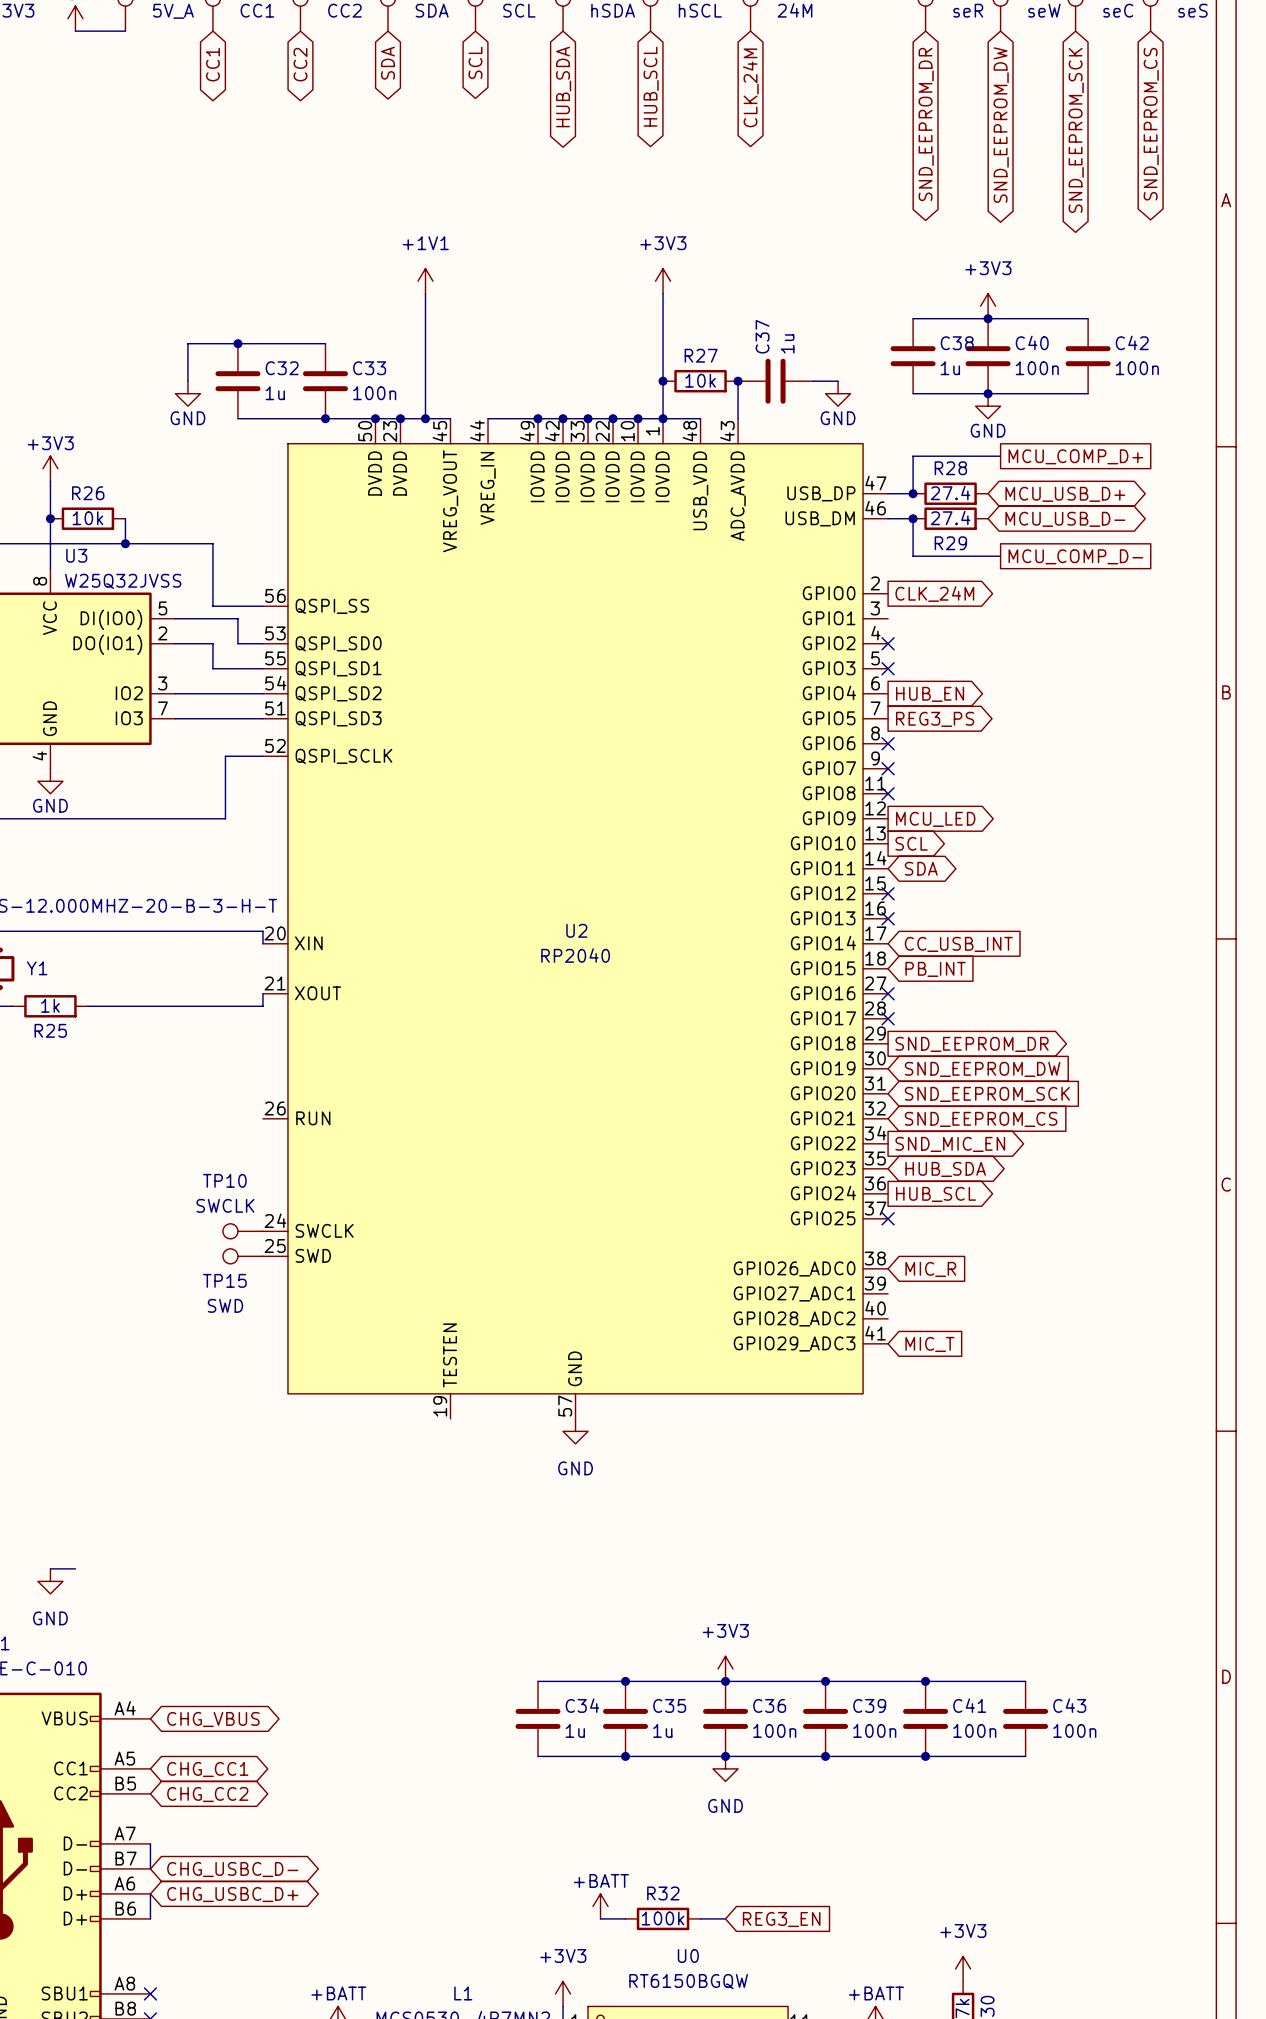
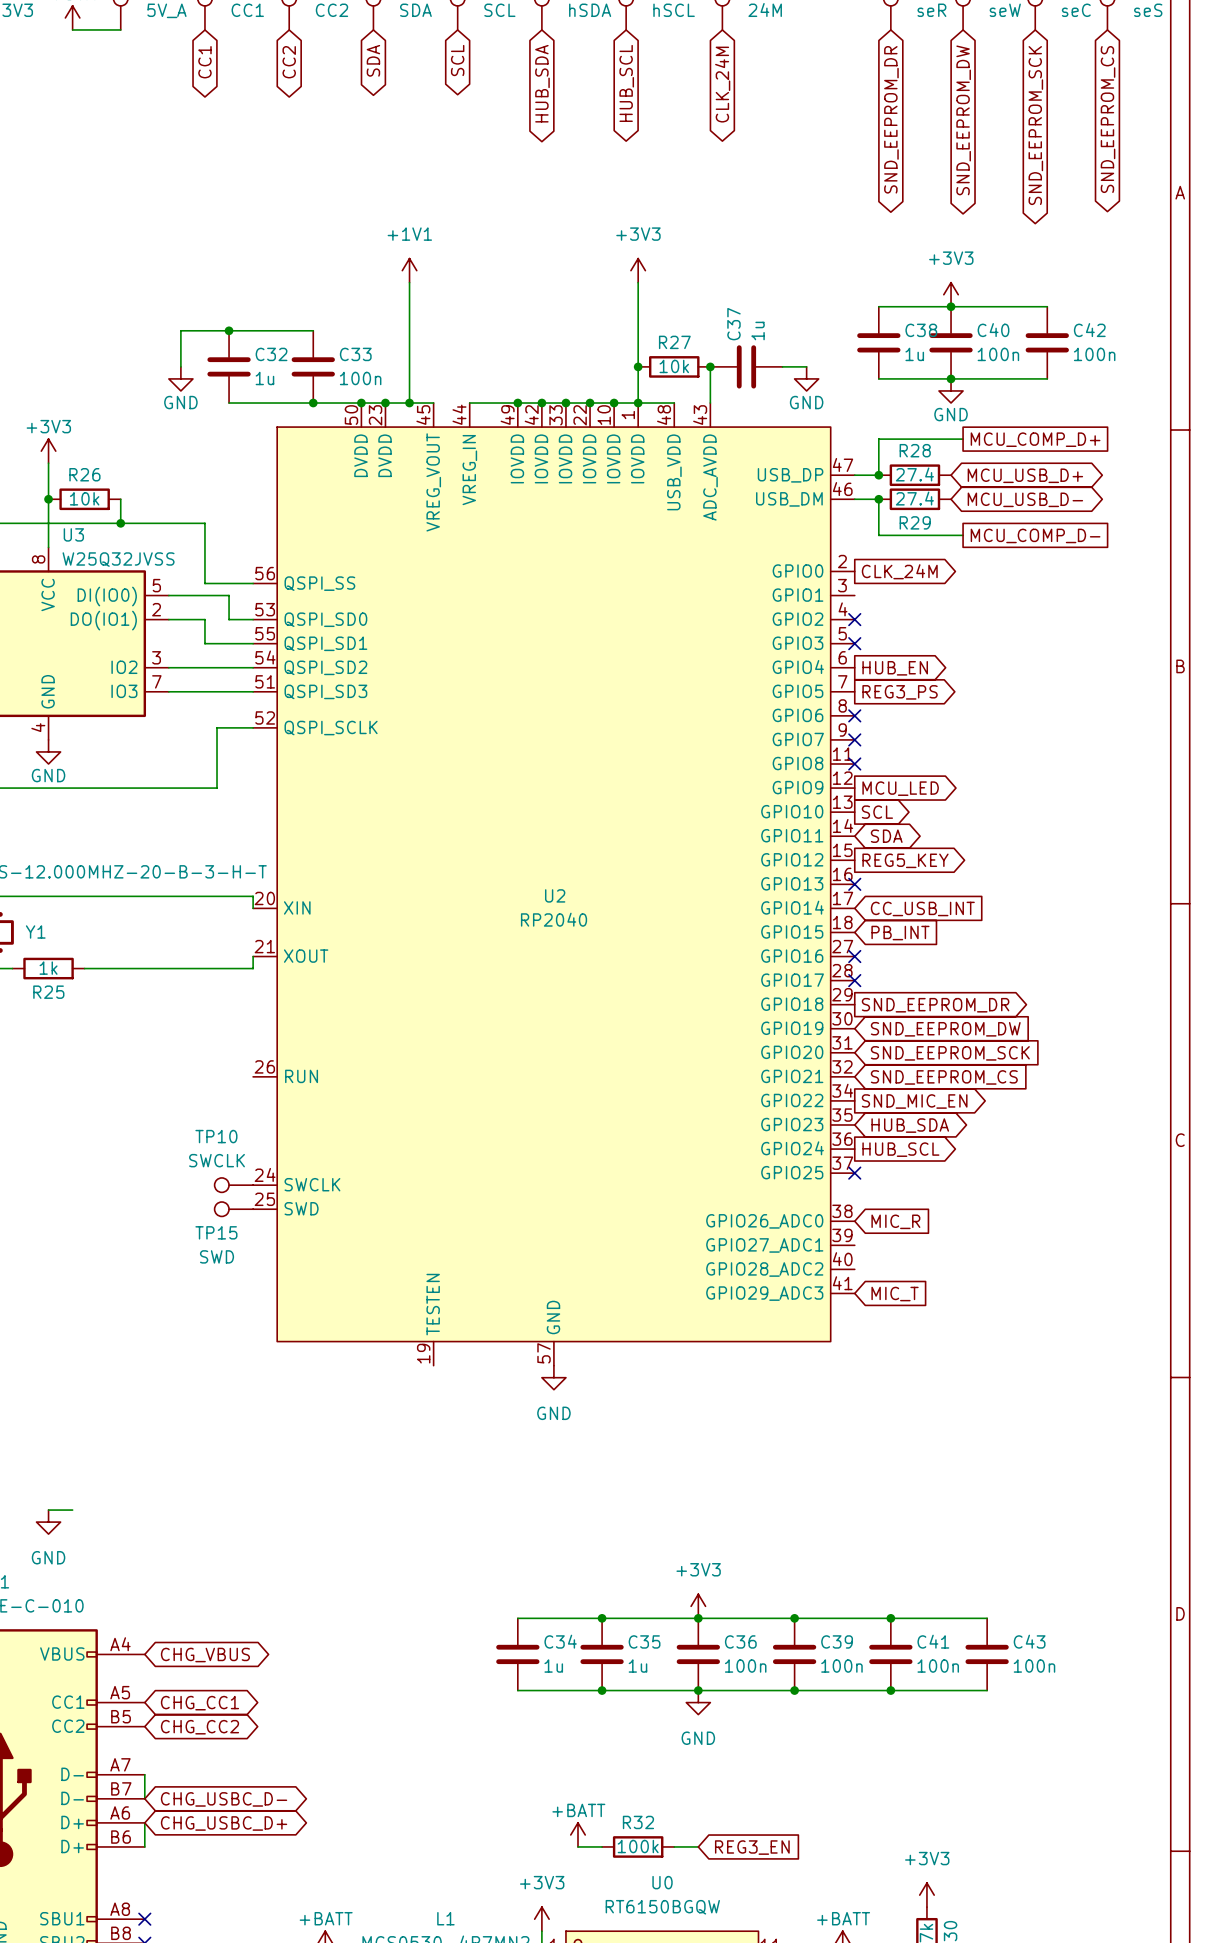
no-connect mark: (888, 893) -> none
global label: none -> REG5_KEY (905, 860)

